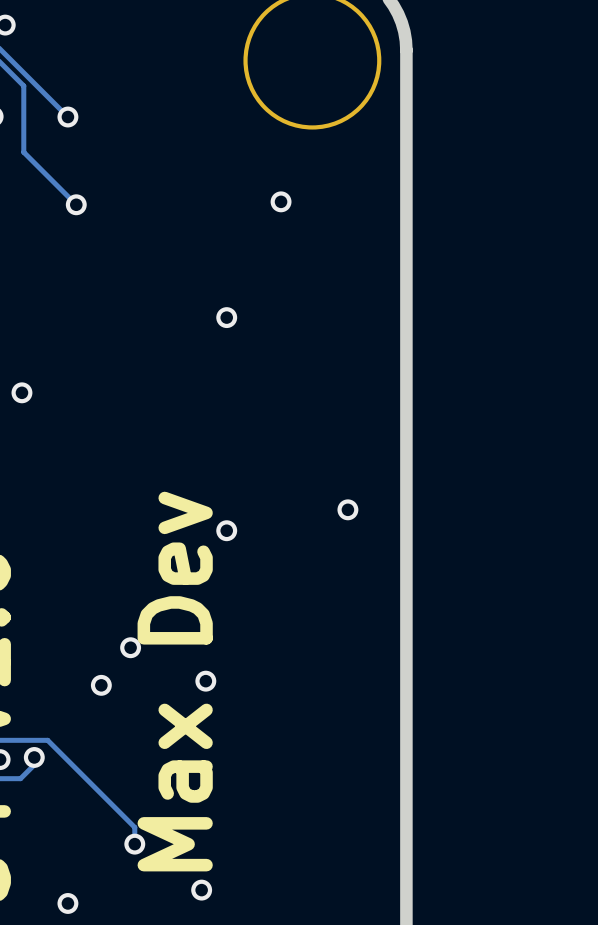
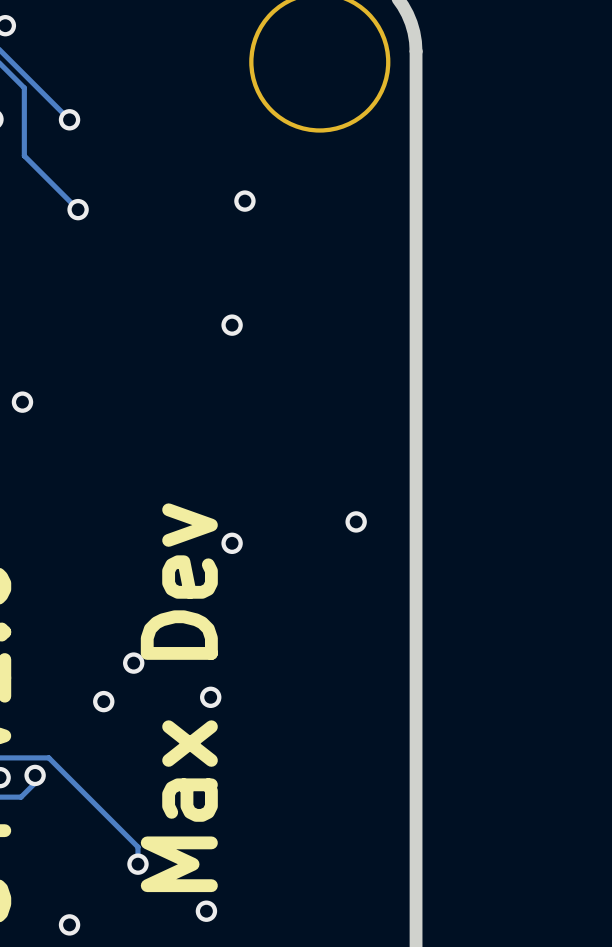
via position: (281, 201) -> (244, 201)

